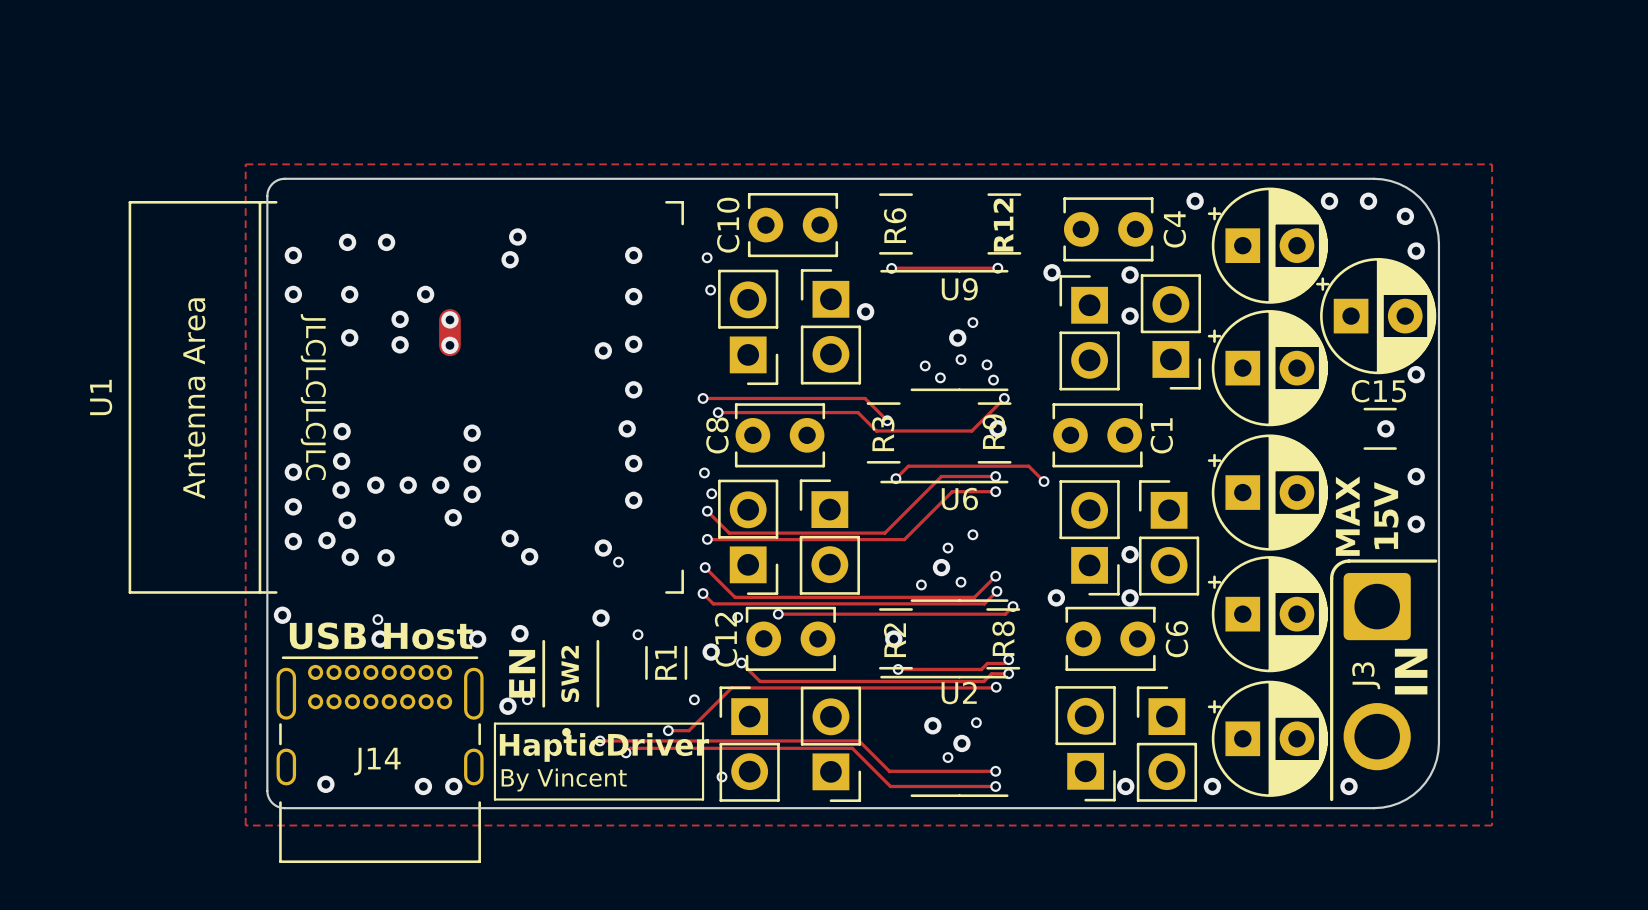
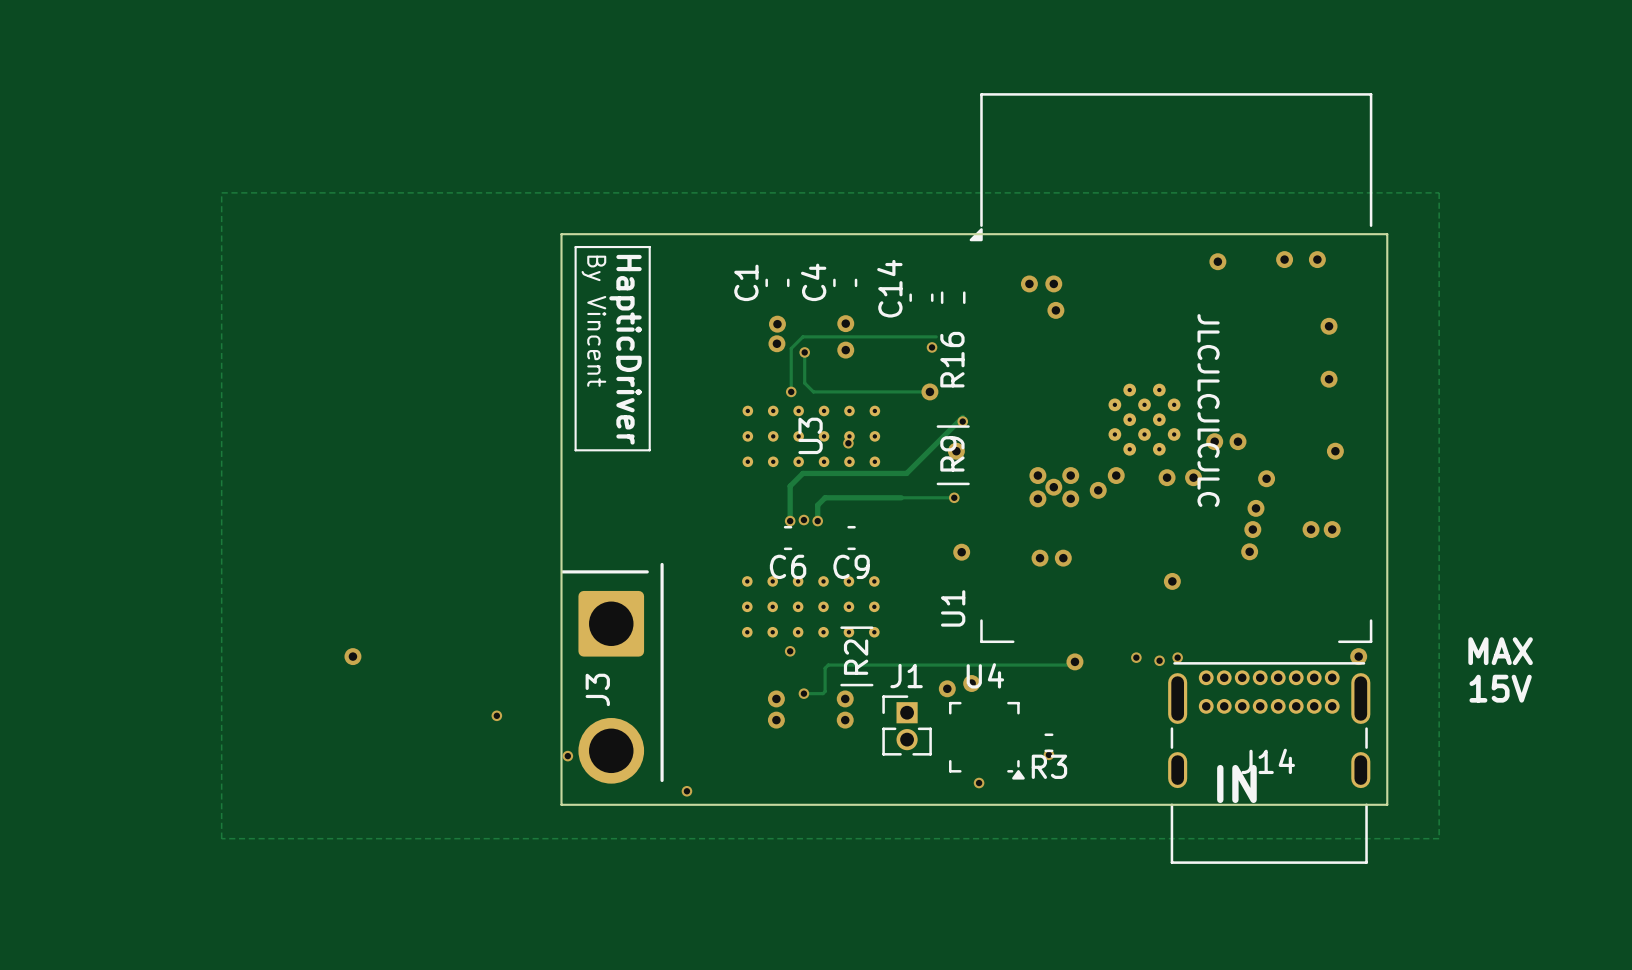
C4 footprint: [1063, 197, 1154, 262] -> [833, 278, 858, 288]
U1 footprint: [128, 201, 684, 594] -> [969, 93, 1373, 644]
via: (1195, 201) -> none
via: (1329, 201) -> none
via: (1368, 201) -> none
via: (1405, 216) -> none
line: none -> (575, 247) (649, 247) (649, 450) (575, 450) (575, 247)
R6: (895, 223) -> none
R12: (1004, 223) -> none
C10: (793, 225) -> none
C4 name position: C4 (1174, 229) -> C4 (813, 282)
via: none -> (1284, 259)
via: none -> (1317, 259)
via: none -> (1217, 261)
via: (517, 236) -> none
via: (347, 242) -> none
via: (386, 242) -> none
board edge: (1438, 243) (1434, 218) (1419, 197) (1398, 183) (1373, 178) (284, 178) (272, 183) (267, 196) (267, 790) (270, 801) (278, 806) (1373, 808) (1398, 803) (1419, 789) (1434, 768) (1438, 743) -> (1387, 270) (1387, 234) (561, 234) (561, 804) (1387, 804) (1387, 758)
part: (1267, 245) -> none
via: (1416, 251) -> none
via: (293, 255) -> none
via: (633, 255) -> none
via: (707, 257) -> none
via: none -> (1029, 283)
via: none -> (1053, 283)
via: (510, 259) -> none
track: (891, 268) (997, 268) -> none
via: (891, 268) -> none
via: (997, 268) -> none
C14: none -> (921, 297)
R16: none -> (953, 297)
via: (1052, 272) -> none
via: (1130, 274) -> none
via: none -> (1055, 310)
text: none -> By Vincent (593, 321)
via: (710, 290) -> none
via: (293, 294) -> none
via: (349, 294) -> none
via: (425, 294) -> none
via: (633, 296) -> none
via: none -> (777, 324)
via: none -> (845, 323)
via: none -> (1329, 326)
via: (865, 311) -> none
track: none -> (936, 336) (802, 336) (791, 348) (791, 391)
via: (1130, 316) -> none
part: (1376, 316) -> none
via: none -> (776, 343)
via: (400, 319) -> none
track: (449, 319) (449, 345) -> none
via: (449, 319) -> none
via: none -> (845, 350)
part: (830, 326) -> none
part: (748, 327) -> none
track: none -> (804, 352) (804, 383) (813, 391) (929, 391)
via: none -> (804, 352)
text: none -> HapticDriver (625, 349)
U9: (944, 330) -> none
part: (1170, 331) -> none
part: (1089, 332) -> none
via: (349, 337) -> none
via position: (957, 337) -> (929, 391)
via: (400, 344) -> none
via: (633, 344) -> none
via: (449, 345) -> none
via: (603, 350) -> none
via: none -> (1329, 379)
via: (961, 359) -> none
via: (987, 364) -> none
via: (925, 365) -> none
via: none -> (791, 391)
part: (1267, 368) -> none
via: (1416, 374) -> none
via: (940, 377) -> none
via: (993, 380) -> none
text: none -> JLCJLCJLCJLC (1208, 410)
via: (633, 389) -> none
track: none -> (962, 417) (906, 473) (802, 473) (790, 486) (790, 521)
U1 name position: U1 (101, 397) -> U1 (953, 608)
text: JLCJLCJLCJLC (313, 397) -> none
track: (703, 398) (865, 398) (887, 420) -> none
via: (703, 398) -> none
track: (1004, 398) (971, 430) (876, 430) (858, 412) (718, 412) -> none
R3 footprint: [866, 402, 901, 464] -> [1044, 733, 1054, 753]
C1 footprint: [1052, 403, 1143, 468] -> [765, 278, 790, 288]
via: (718, 412) -> none
U3: none -> (811, 436)
via: none -> (1214, 441)
via: none -> (1238, 441)
via: (627, 428) -> none
C15: (1380, 428) -> none
via: (342, 431) -> none
via: (472, 433) -> none
C8: (780, 435) -> none
C1 name position: C1 (1161, 435) -> C1 (746, 282)
via: none -> (1037, 475)
via: none -> (1070, 475)
via: none -> (1116, 475)
via: none -> (1167, 477)
via: none -> (1193, 477)
via: none -> (1266, 478)
via: (341, 461) -> none
via: (633, 463) -> none
via: (472, 464) -> none
via: none -> (1053, 487)
via: none -> (1098, 490)
via: (293, 472) -> none
via: (704, 472) -> none
track: (941, 476) (884, 533) (729, 533) (707, 511) -> (901, 497) (825, 497) (817, 505) (817, 521)
via: (1416, 476) -> none
via: none -> (1037, 498)
via: none -> (1070, 498)
track: (895, 478) (908, 466) (1028, 466) (1044, 481) -> none
via: (895, 478) -> none
via: (1044, 481) -> none
via: (375, 485) -> none
via: (408, 485) -> none
via: (440, 485) -> none
via: none -> (1256, 508)
via: (341, 490) -> none
track: (995, 491) (952, 491) (904, 539) (707, 539) -> none
via: (995, 491) -> none
part: (1267, 492) -> none
via: (711, 493) -> none
via: (472, 494) -> none
via: none -> (803, 520)
via: (633, 500) -> none
via: none -> (790, 521)
via: none -> (817, 521)
via: (293, 506) -> none
via: none -> (1252, 529)
via: none -> (1311, 529)
via: none -> (1332, 529)
via: (707, 511) -> none
text rotation: 0° (1386, 515) -> 90° clockwise (1500, 688)
text position: 15V (1386, 515) -> 15V (1500, 688)
text rotation: 0° (1347, 516) -> 90° clockwise (1500, 651)
text position: MAX (1347, 516) -> MAX (1500, 651)
via: (453, 517) -> none
C9: none -> (851, 538)
via: (347, 520) -> none
via: (1416, 524) -> none
via: none -> (1249, 551)
via: none -> (961, 552)
via: (972, 534) -> none
part: (748, 537) -> none
part: (829, 537) -> none
part: (1089, 537) -> none
part: (1169, 537) -> none
via: (510, 538) -> none
via: none -> (1040, 558)
via: none -> (1063, 558)
via: (707, 539) -> none
via: (326, 540) -> none
via: (293, 541) -> none
U6: (944, 541) -> none
line: none -> (662, 564) (662, 780)
via: (603, 548) -> none
via: (947, 548) -> none
line: none -> (562, 571) (647, 571)
via: (1130, 554) -> none
via: (529, 556) -> none
via: (350, 557) -> none
via: (386, 557) -> none
line: (1435, 561) (1346, 561) (1338, 564) (1332, 571) (1331, 799) -> none
via: (618, 562) -> none
via: none -> (1172, 581)
track: (705, 567) (735, 597) (974, 597) (995, 576) -> none
via: (705, 567) -> none
via: (941, 567) -> none
via: (995, 576) -> none
via: (961, 582) -> none
via: (921, 584) -> none
part: none -> (810, 606)
track: (996, 591) (984, 603) (713, 603) (703, 593) -> none
via: (996, 591) -> none
via: (703, 593) -> none
via: (1056, 597) -> none
via: (1130, 597) -> none
track: (1013, 606) (1005, 614) (778, 614) -> none
via: (1013, 606) -> none
C6 footprint: [1065, 606, 1156, 671] -> [783, 525, 793, 551]
via: (778, 614) -> none
part: (1267, 614) -> none
via: (282, 615) -> none
via: (737, 617) -> none
via: (601, 618) -> none
via: (377, 619) -> none
via: (519, 633) -> none
via: none -> (790, 651)
via: (638, 634) -> none
text: USB Host (381, 635) -> none
C12: (790, 638) -> none
R8: (1003, 638) -> none
via: (477, 639) -> none
via: (893, 639) -> none
C6 name position: C6 (1176, 639) -> C6 (788, 566)
via: none -> (1358, 656)
via: none -> (1136, 657)
via: none -> (1177, 657)
via: none -> (1159, 660)
via: none -> (1074, 661)
track: none -> (1071, 665) (828, 665) (825, 668) (825, 691) (822, 693) (803, 693)
via: (711, 652) -> none
track: (1008, 659) (1004, 663) (987, 663) (981, 669) (898, 669) -> none
via: (1008, 659) -> none
R1: (666, 662) -> none
track: (741, 662) (760, 681) (983, 681) (991, 673) (1008, 673) -> none
via: (741, 662) -> none
via: none -> (971, 683)
via position: (898, 669) -> (845, 698)
J3 position: (1377, 671) -> (611, 687)
text rotation: 0° (1411, 671) -> 90° clockwise (1236, 783)
text position: IN (1411, 671) -> IN (1236, 783)
via: none -> (947, 688)
text: EN (522, 673) -> none
via: (1008, 673) -> none
via: none -> (803, 693)
via: none -> (776, 698)
track: (996, 687) (731, 687) (688, 730) (668, 730) -> none
via: (996, 687) -> none
SW2: (570, 688) -> none
via: (694, 699) -> none
via: none -> (776, 720)
via: none -> (845, 720)
via: (507, 706) -> none
J1: none -> (907, 725)
via: (976, 722) -> none
line: (494, 723) (703, 723) (703, 799) (494, 799) (494, 723) -> none
via: (932, 725) -> none
U4: none -> (986, 740)
via: (668, 730) -> none
U2: (944, 736) -> none
part: (1267, 738) -> none
via: none -> (1048, 754)
track: (600, 740) (859, 740) (889, 771) (995, 771) -> none
via: (961, 743) -> none
part: (1085, 743) -> none
part: (749, 744) -> none
part: (830, 744) -> none
part: (1166, 744) -> none
text: HapticDriver (604, 747) -> none
track: (626, 752) (630, 748) (852, 748) (890, 786) (995, 786) -> none
via: (626, 752) -> none
via: (947, 757) -> none
J14 position: (380, 759) -> (1269, 762)
via: none -> (979, 783)
via: (995, 771) -> none
text: By Vincent (564, 779) -> none
via: (325, 784) -> none
via: (423, 786) -> none
via: (453, 786) -> none
via: (995, 786) -> none
via: (1125, 786) -> none
via: (1212, 786) -> none
via: (1349, 786) -> none

